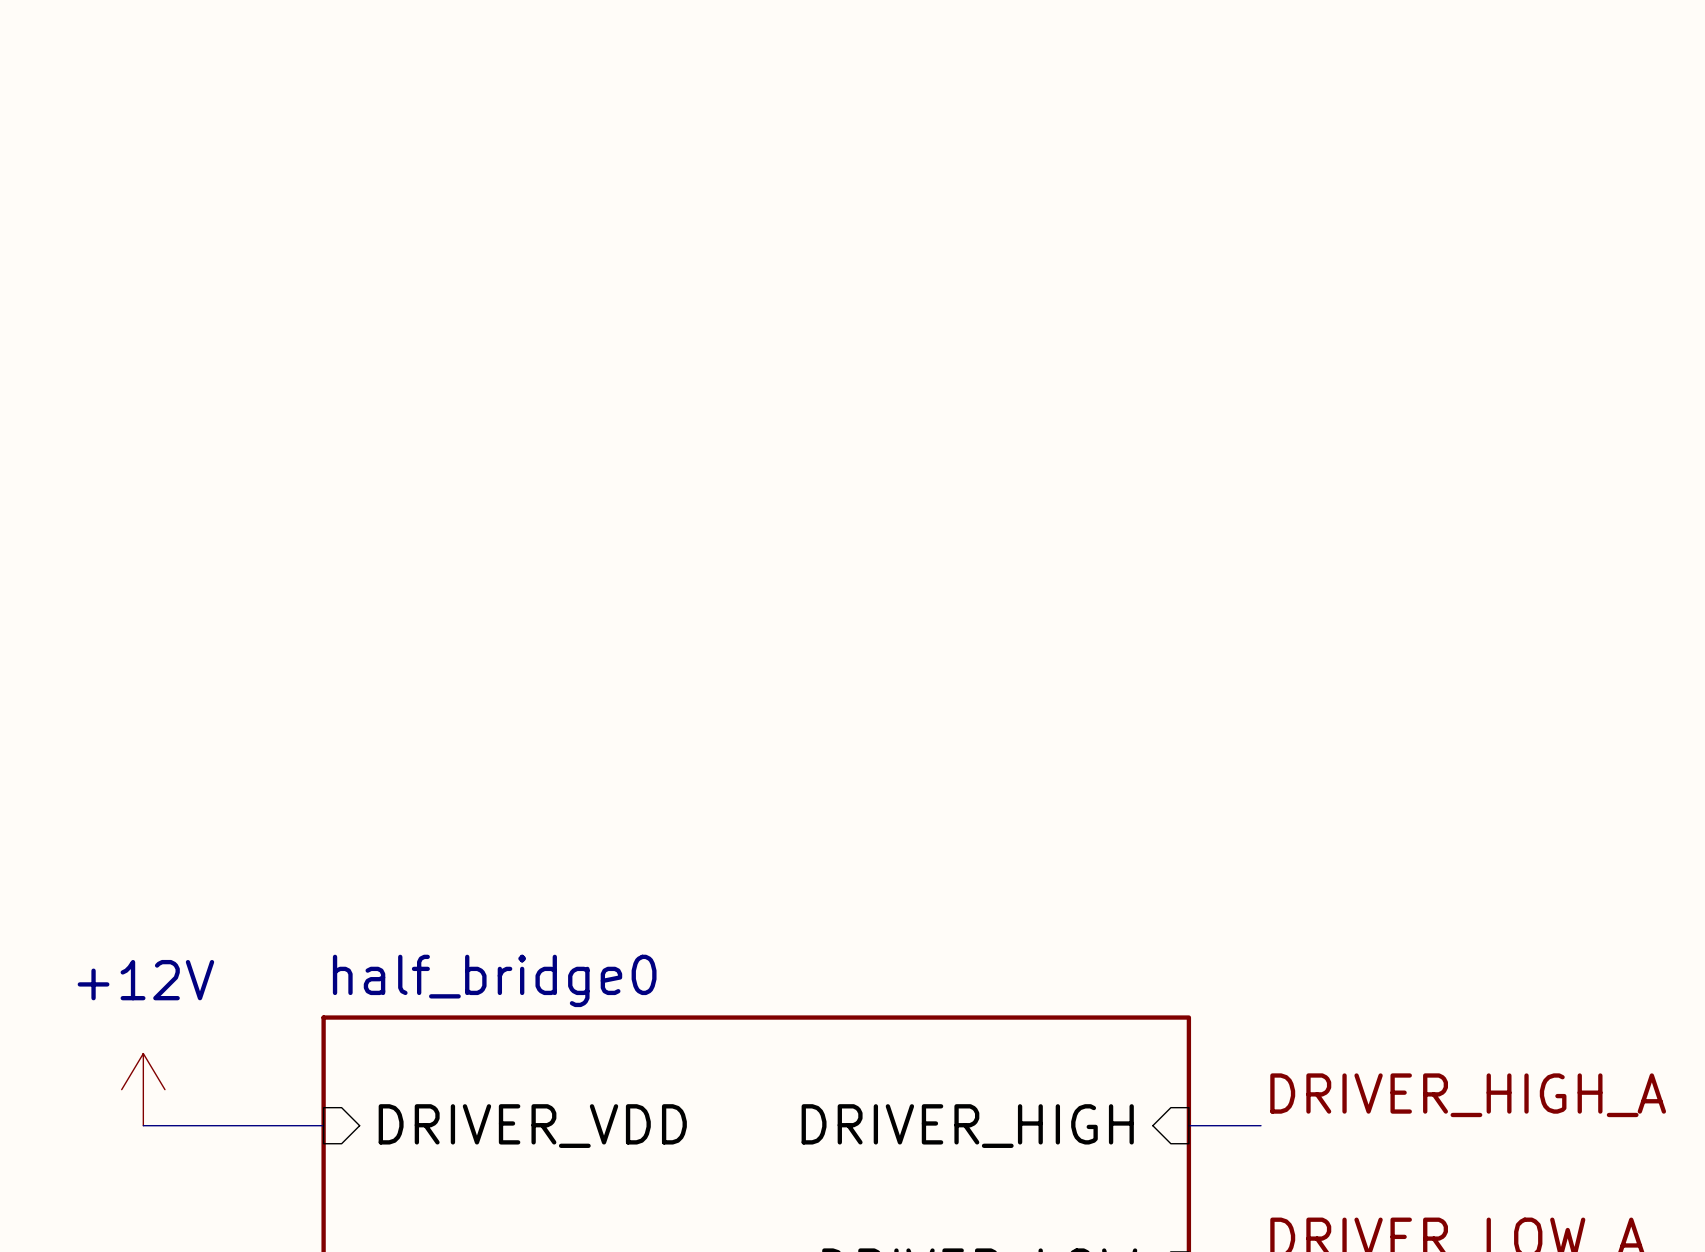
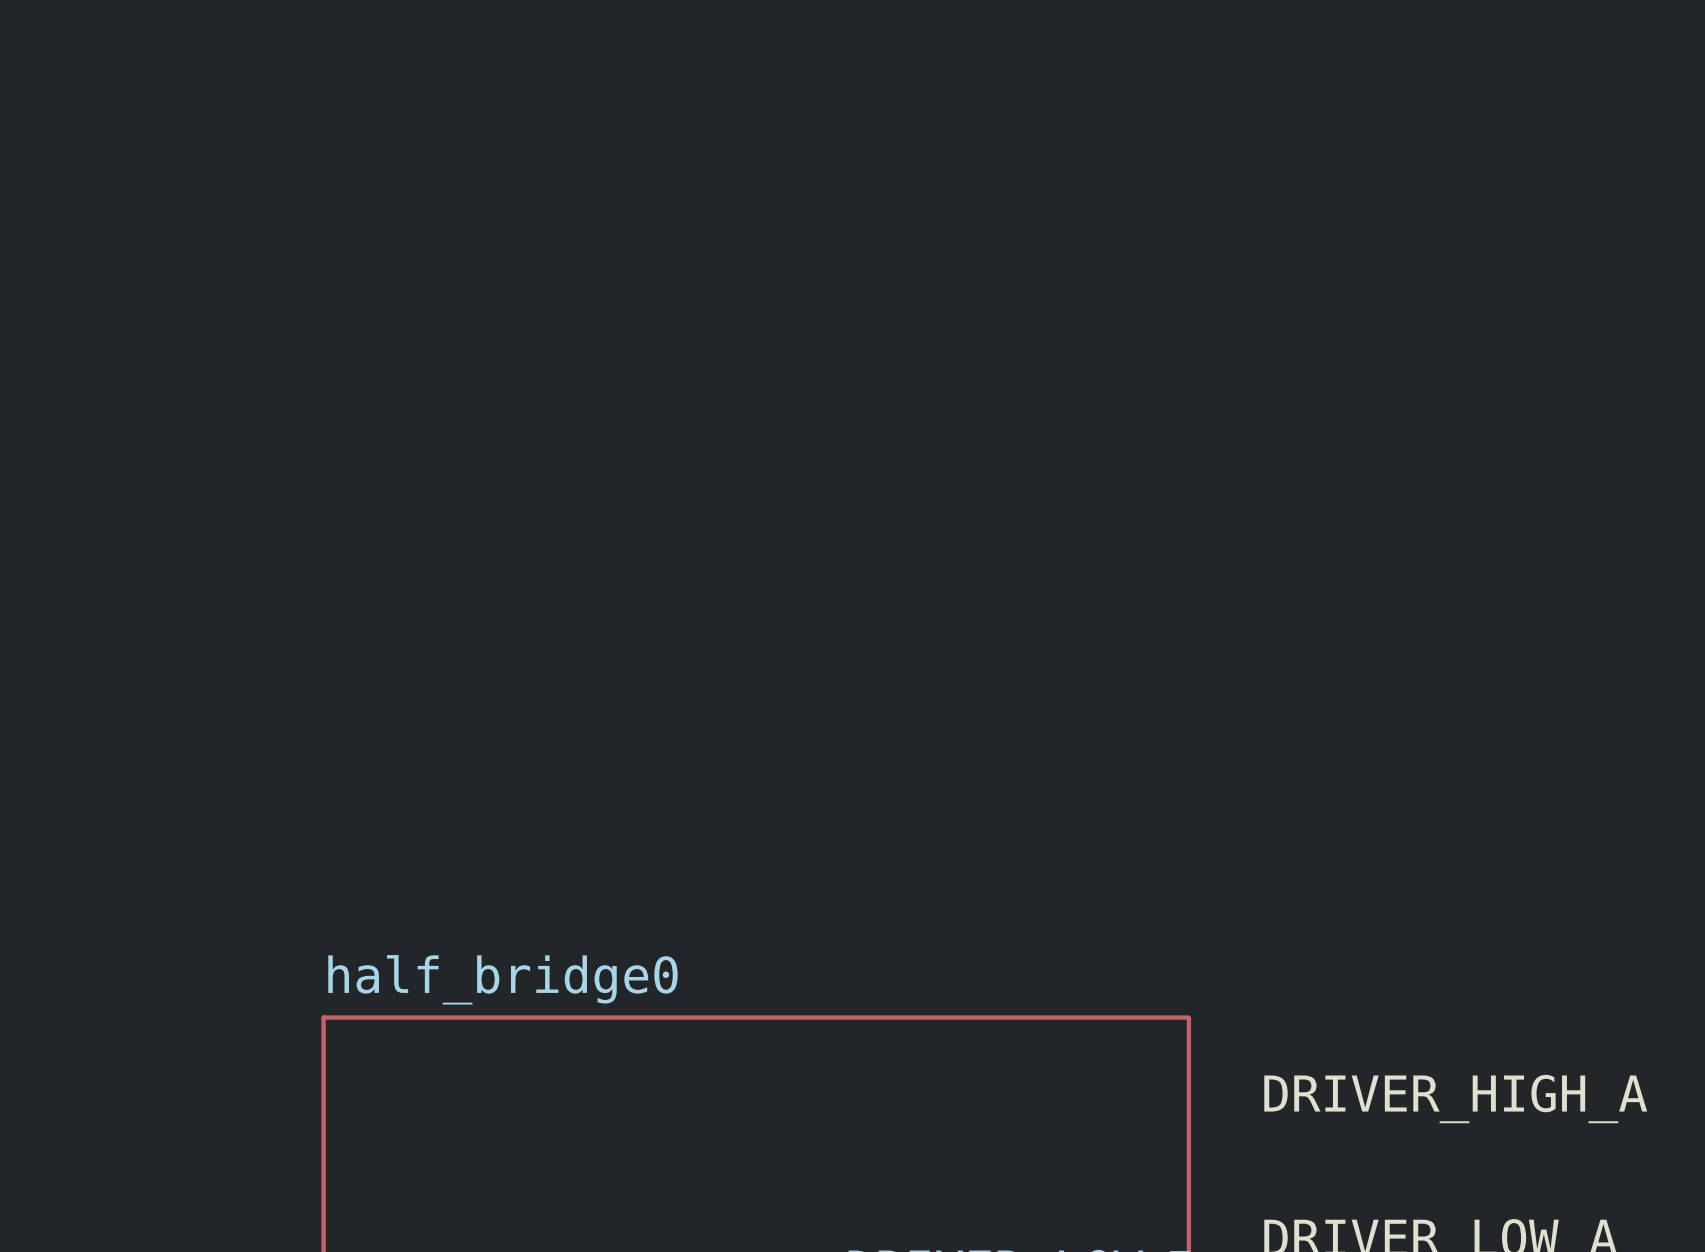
power symbol: +12V (143, 1089) -> none
wire: (143, 1125) (323, 1125) -> none
wire: (1188, 1125) (1261, 1125) -> none
sheet pin: DRIVER_VDD (532, 1126) -> none
sheet pin: DRIVER_HIGH (967, 1126) -> none

